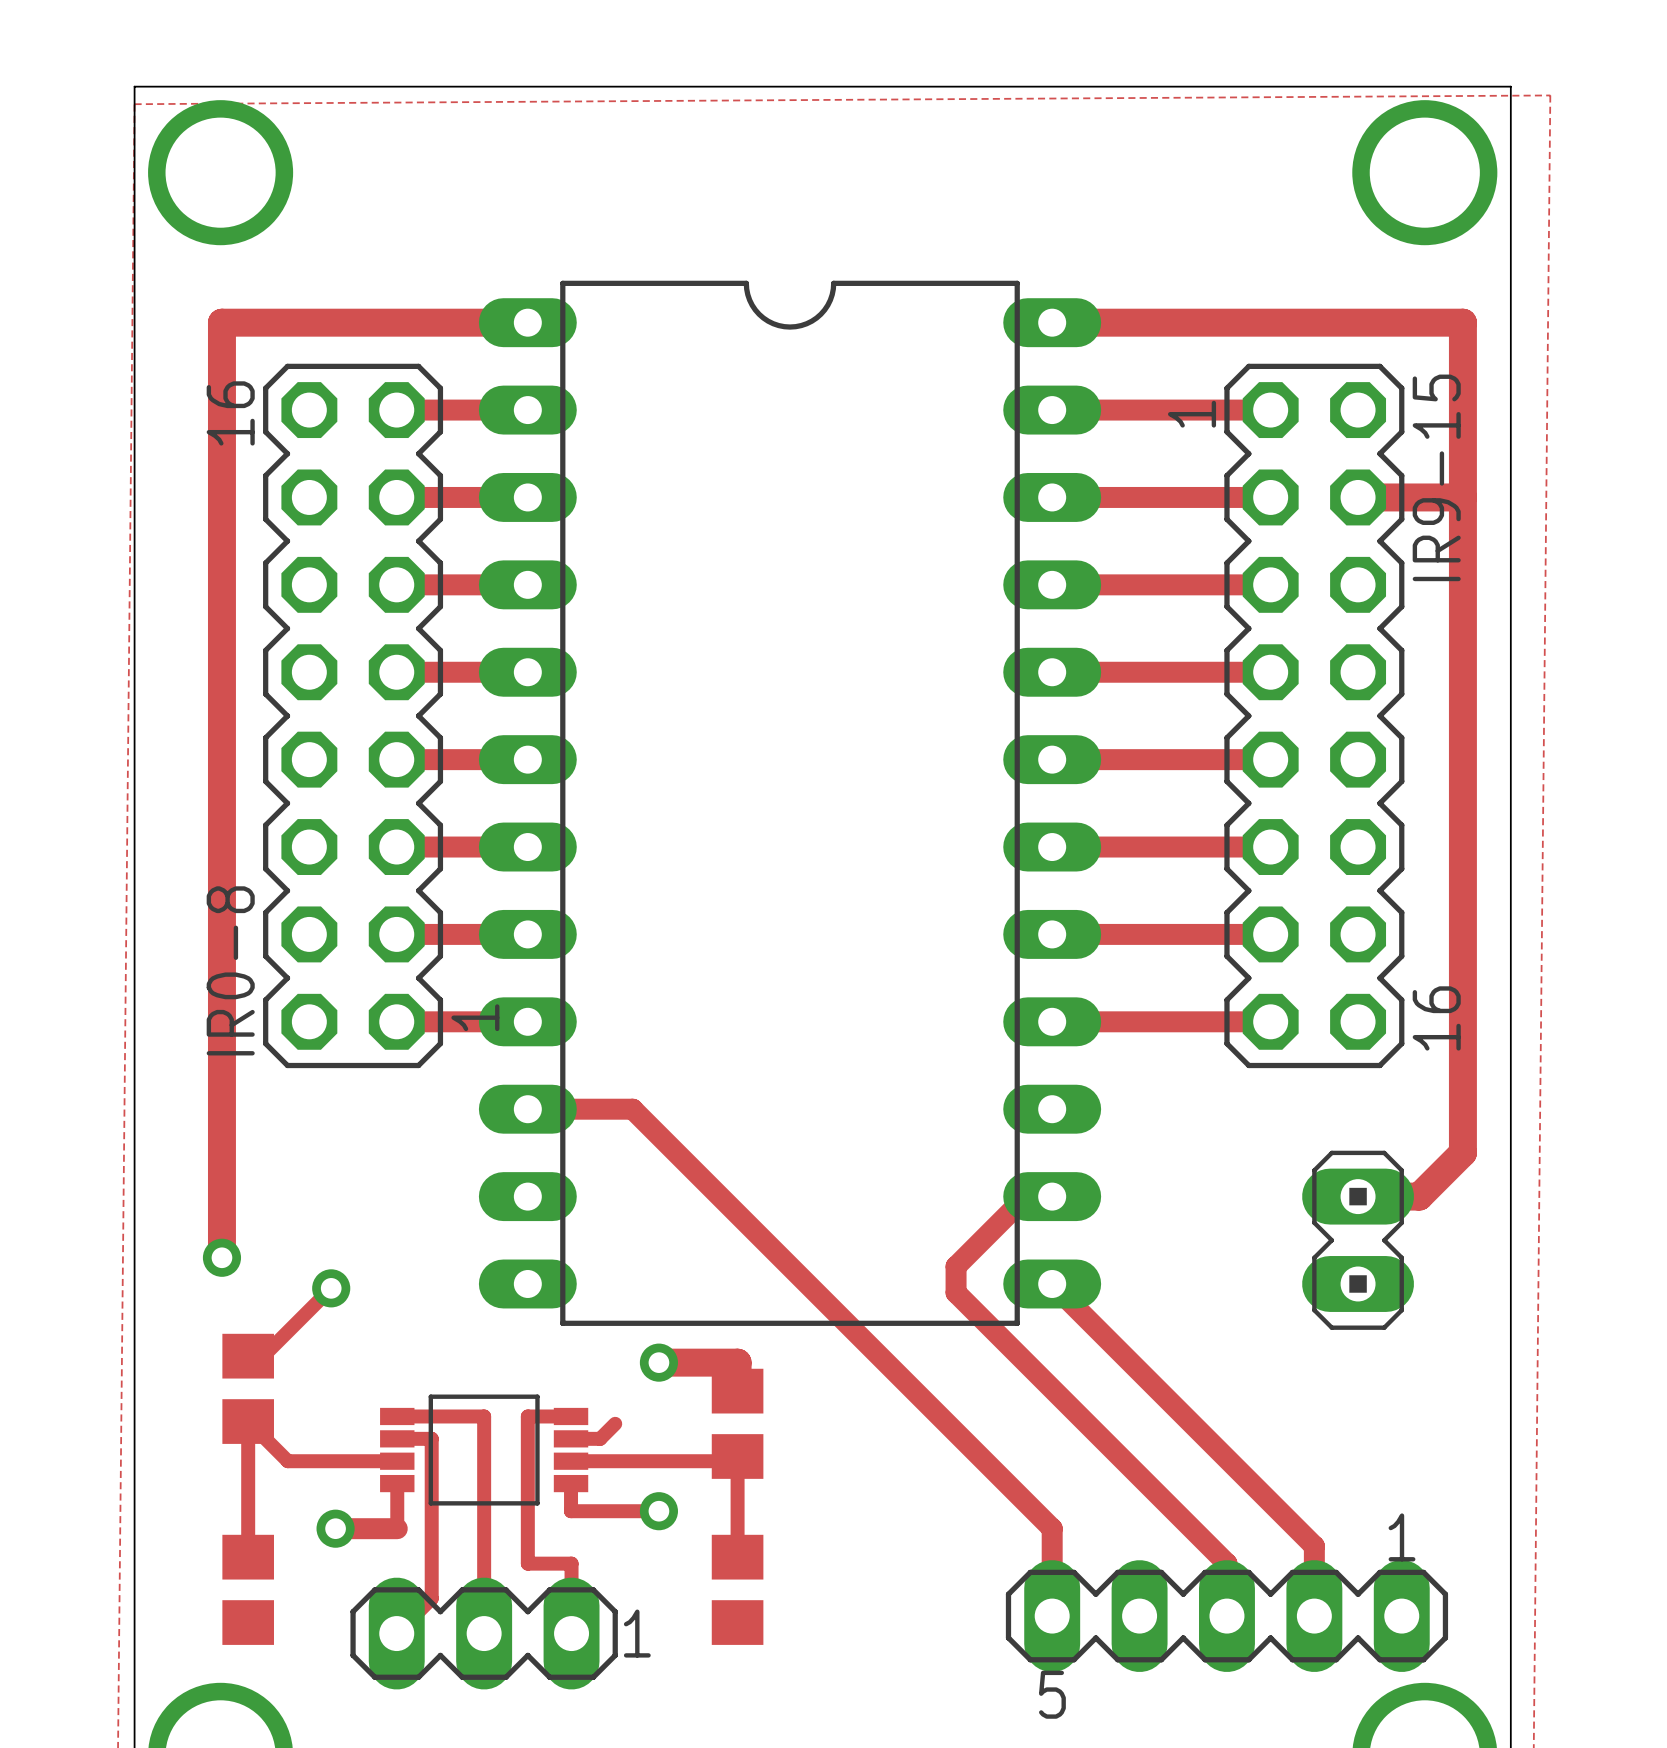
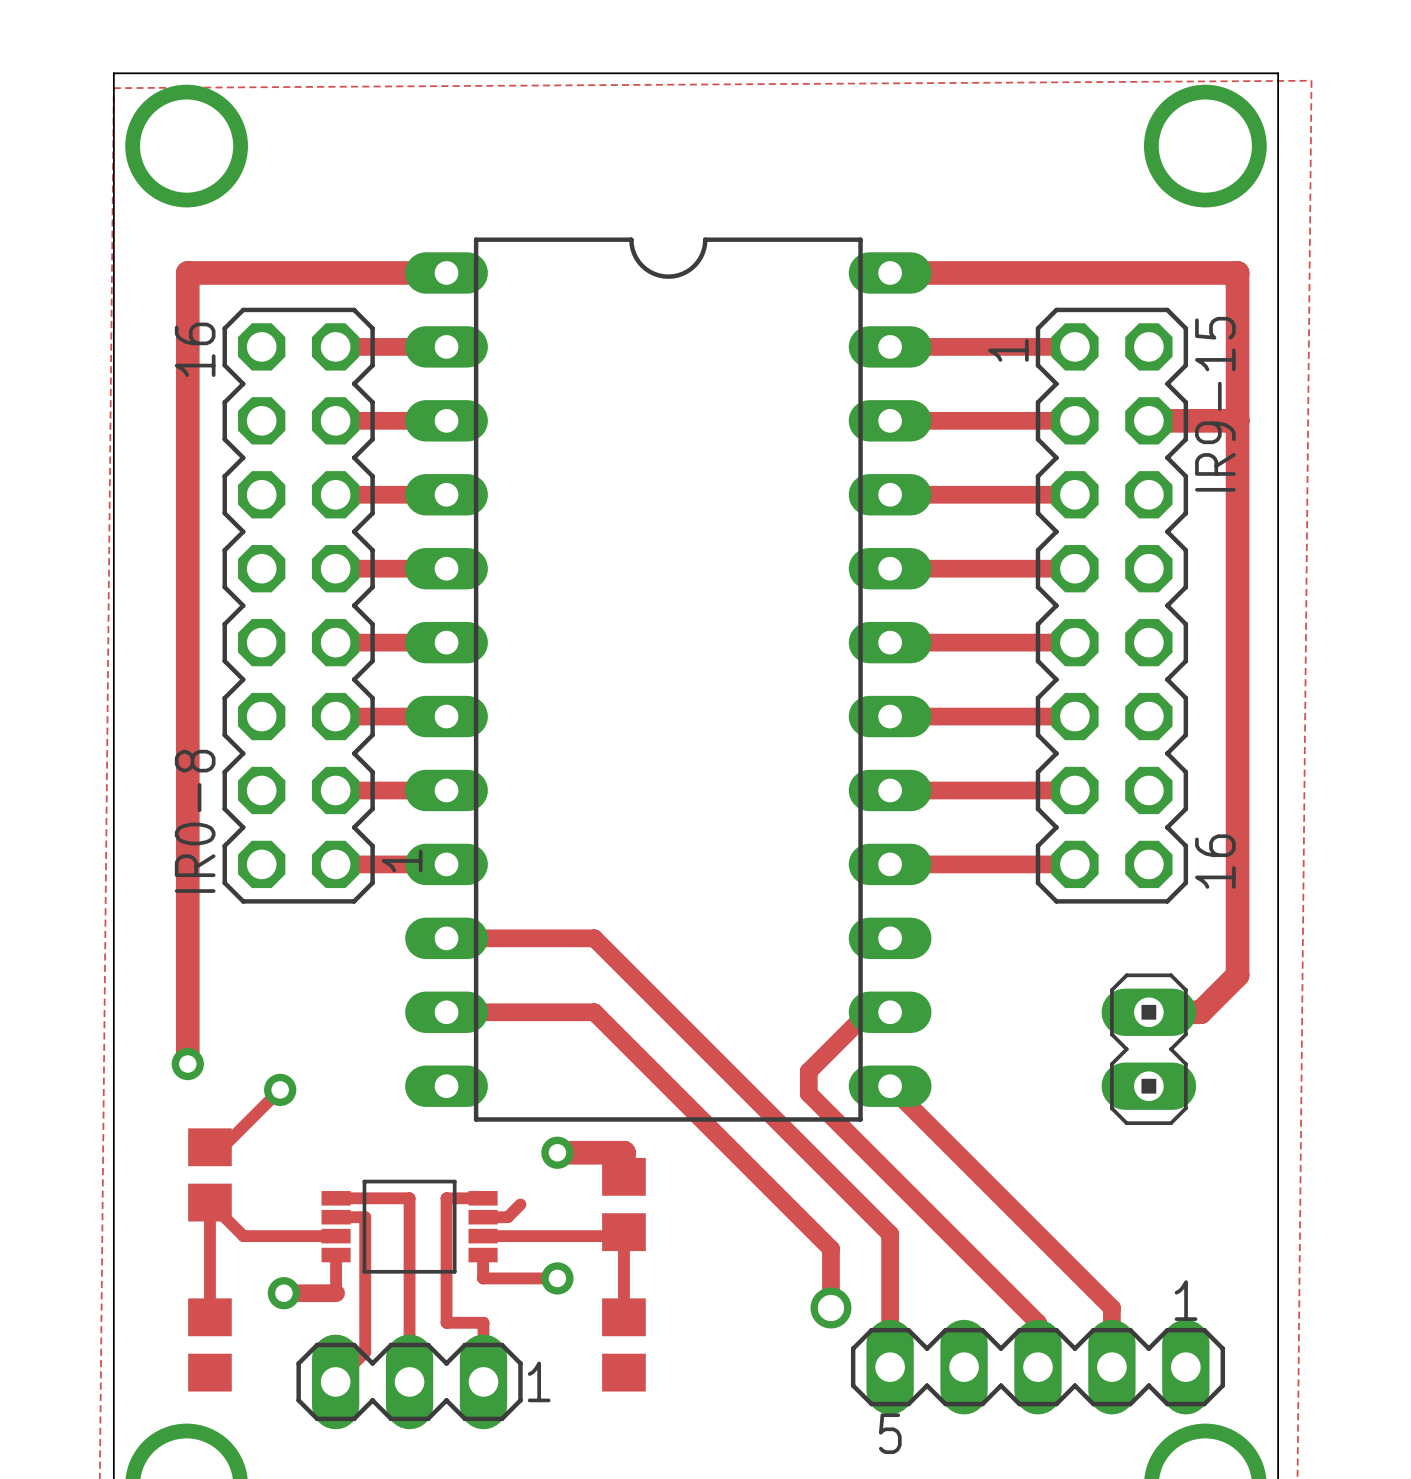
track: (632, 1109) (1052, 1528) -> (535, 938) (594, 938) (890, 1234) (890, 1293)
track: none -> (446, 1012) (594, 1012) (830, 1248) (830, 1308)
via: none -> (830, 1308)

